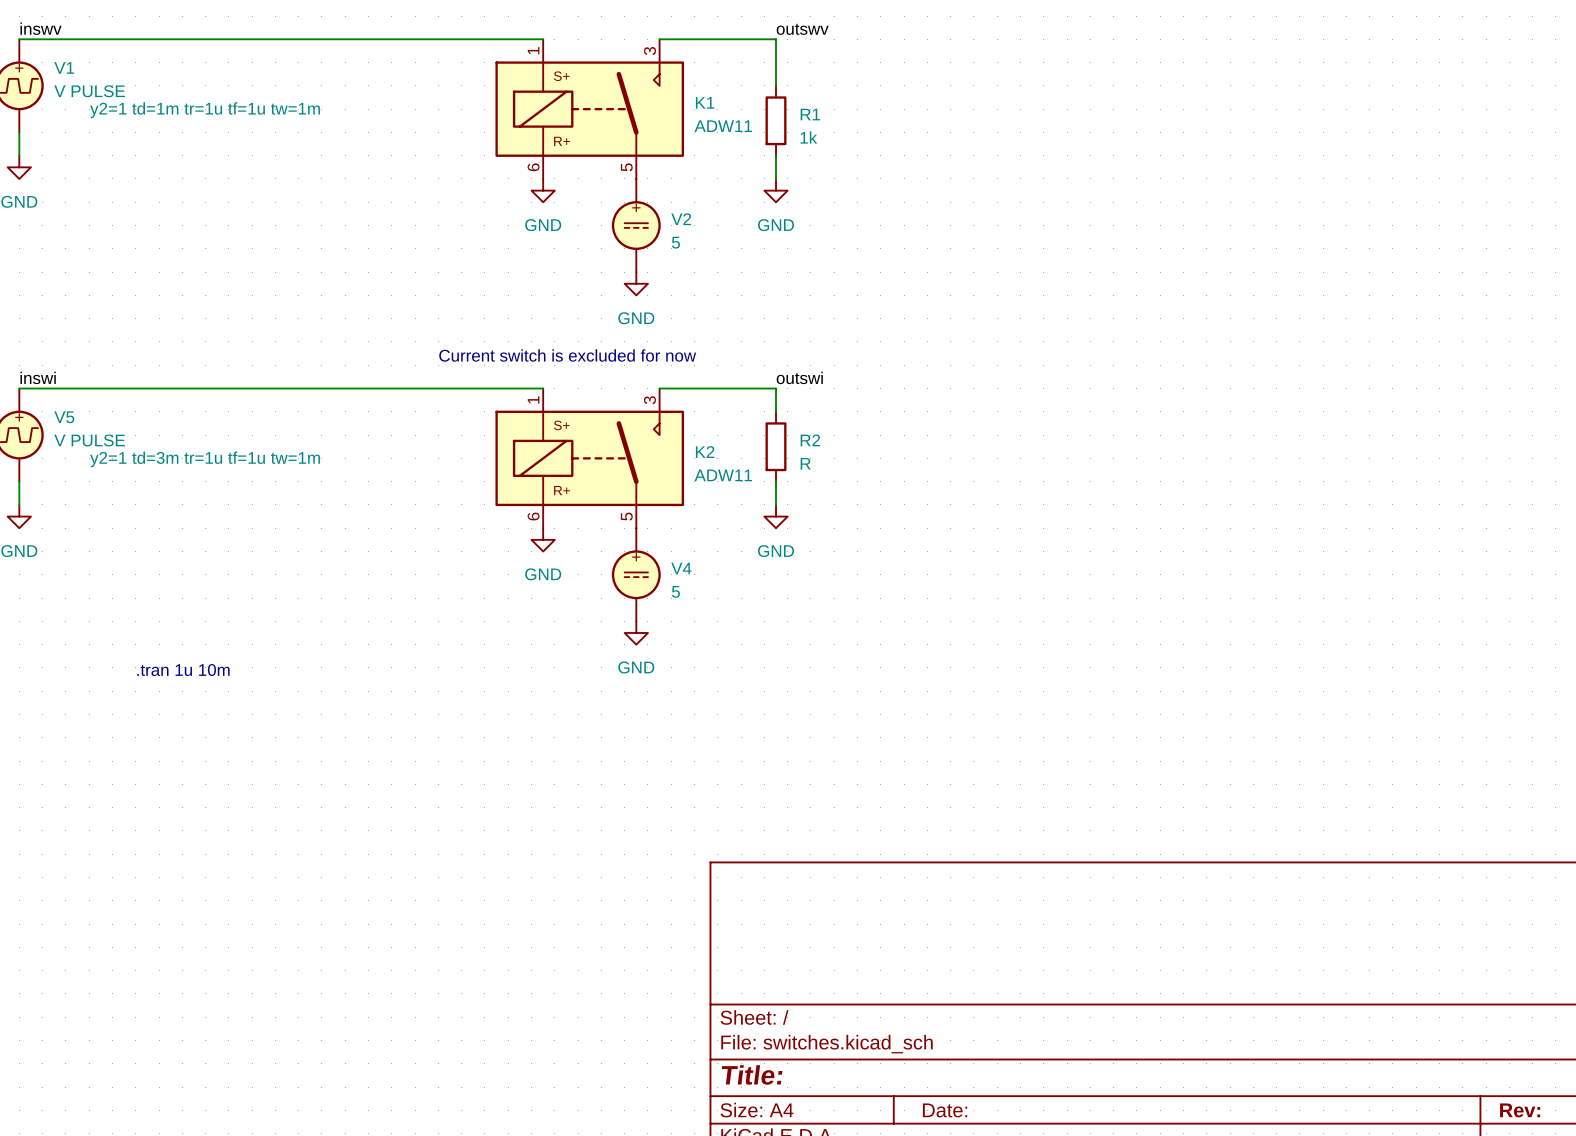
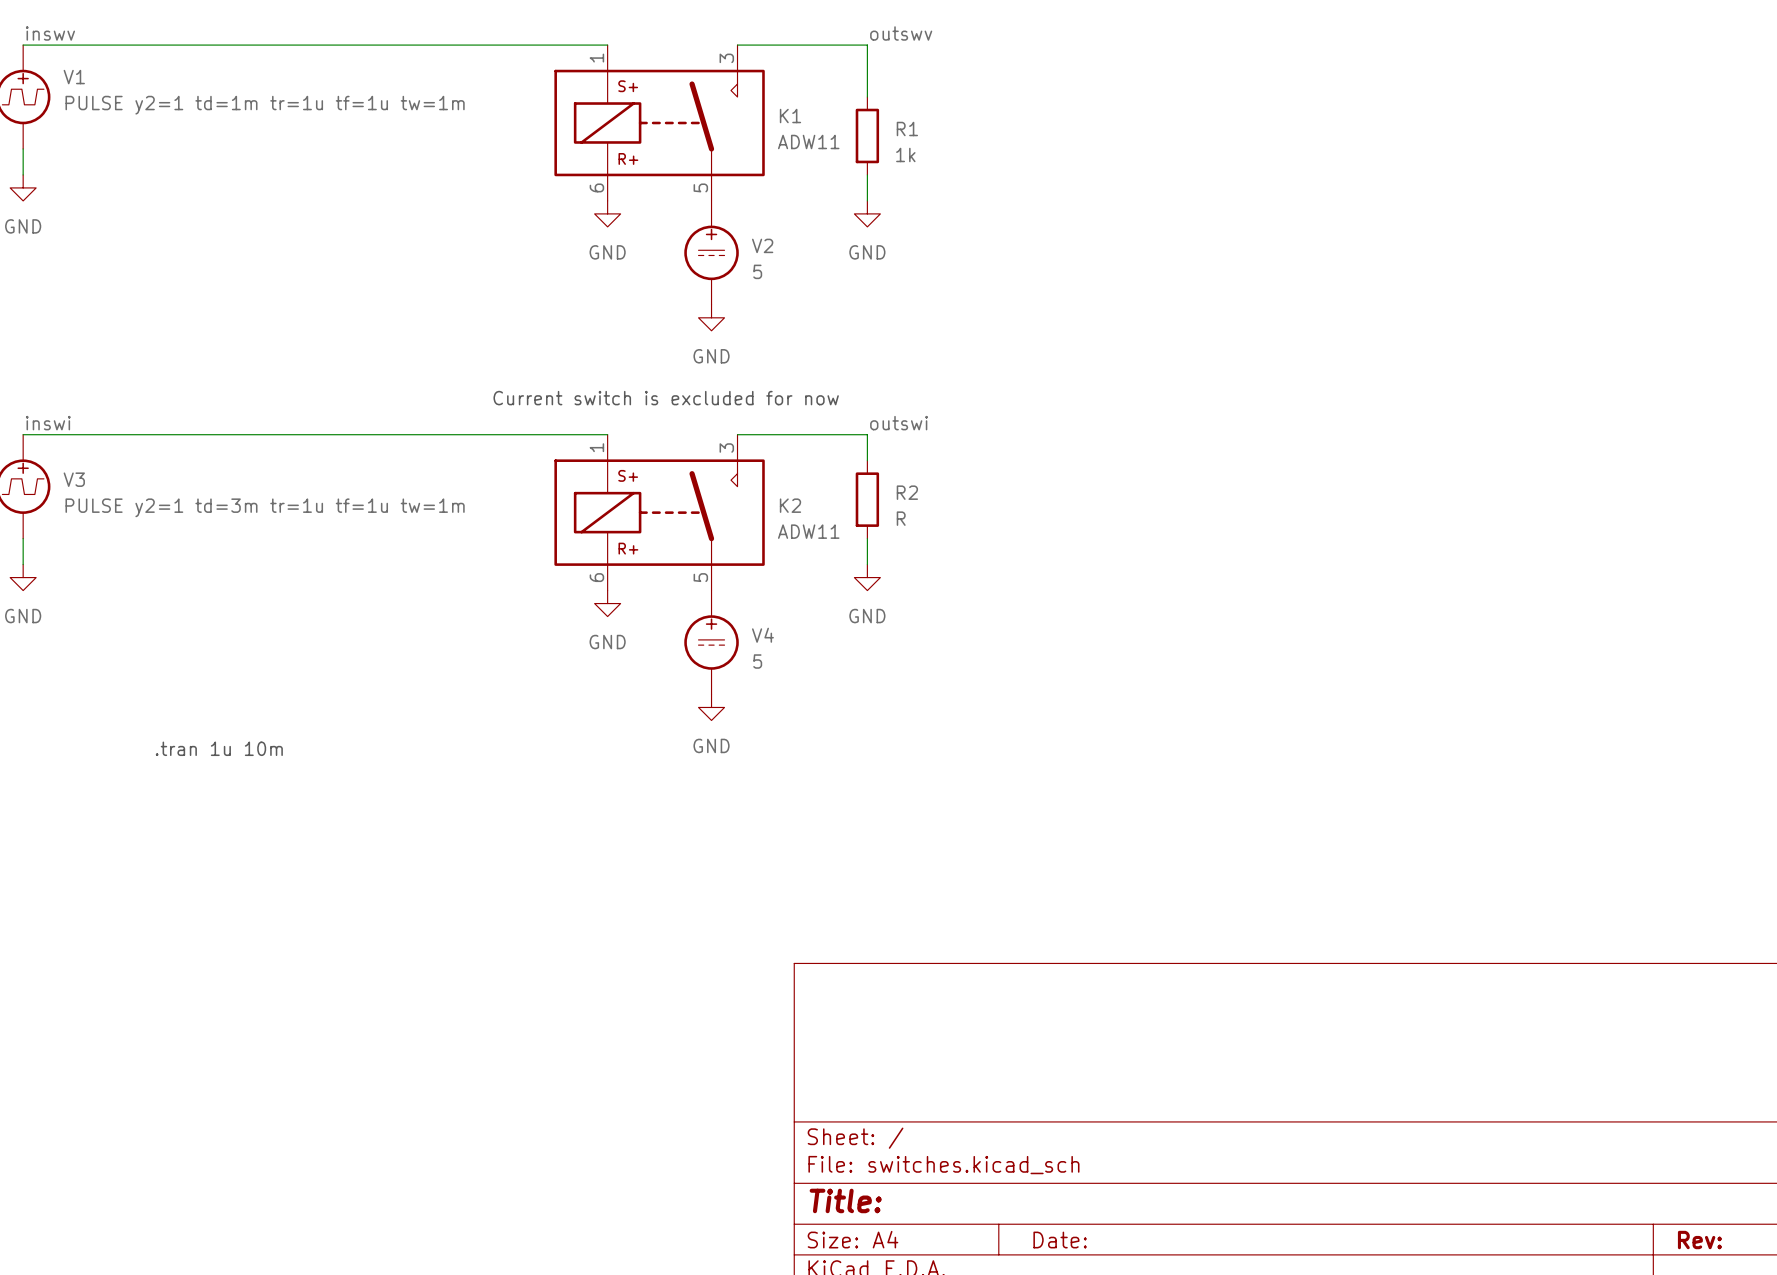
V1 value: V PULSE (89, 91) -> PULSE y2=1 td=1m tr=1u tf=1u tw=1m (265, 105)
V1 text: y2=1 td=1m tr=1u tf=1u tw=1m (205, 110) -> none
V5 name: V5 (64, 417) -> V3 (74, 479)
V5 value: V PULSE (89, 440) -> PULSE y2=1 td=3m tr=1u tf=1u tw=1m (265, 507)
V5 text: y2=1 td=3m tr=1u tf=1u tw=1m (205, 459) -> none

